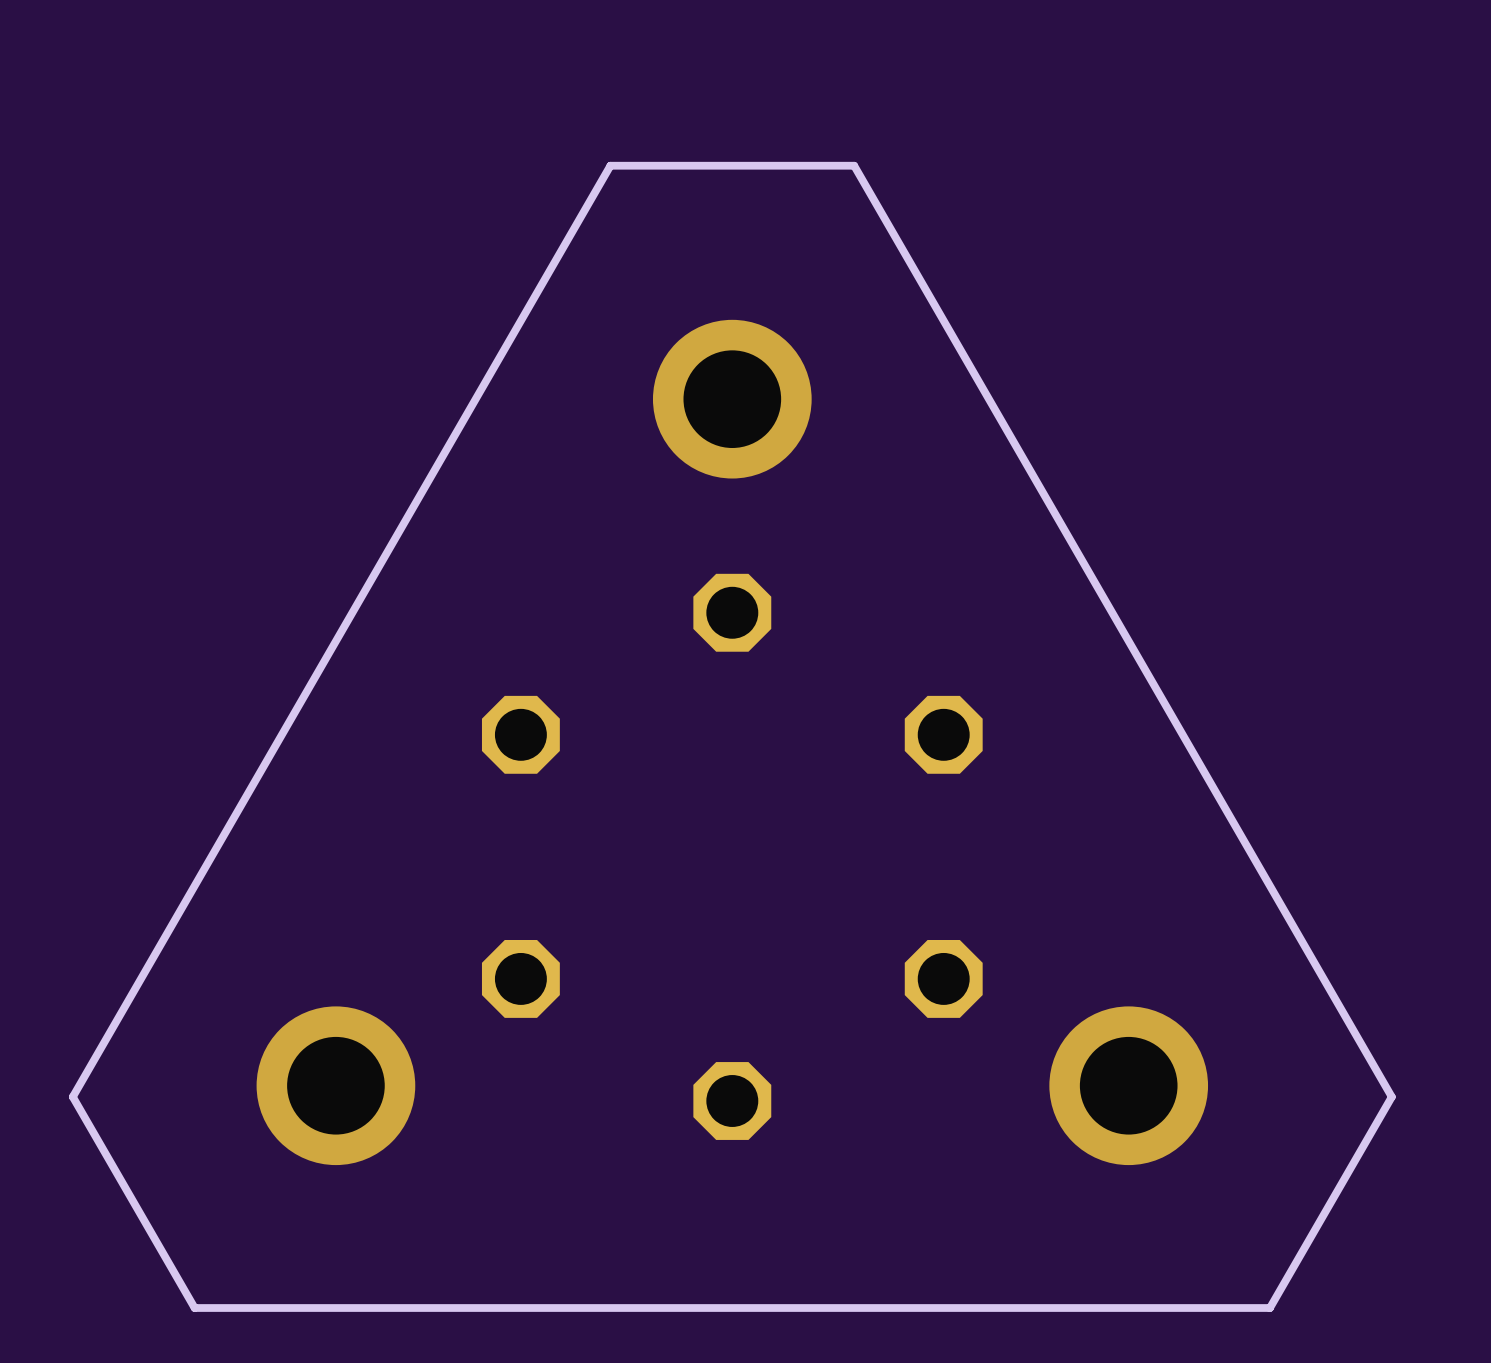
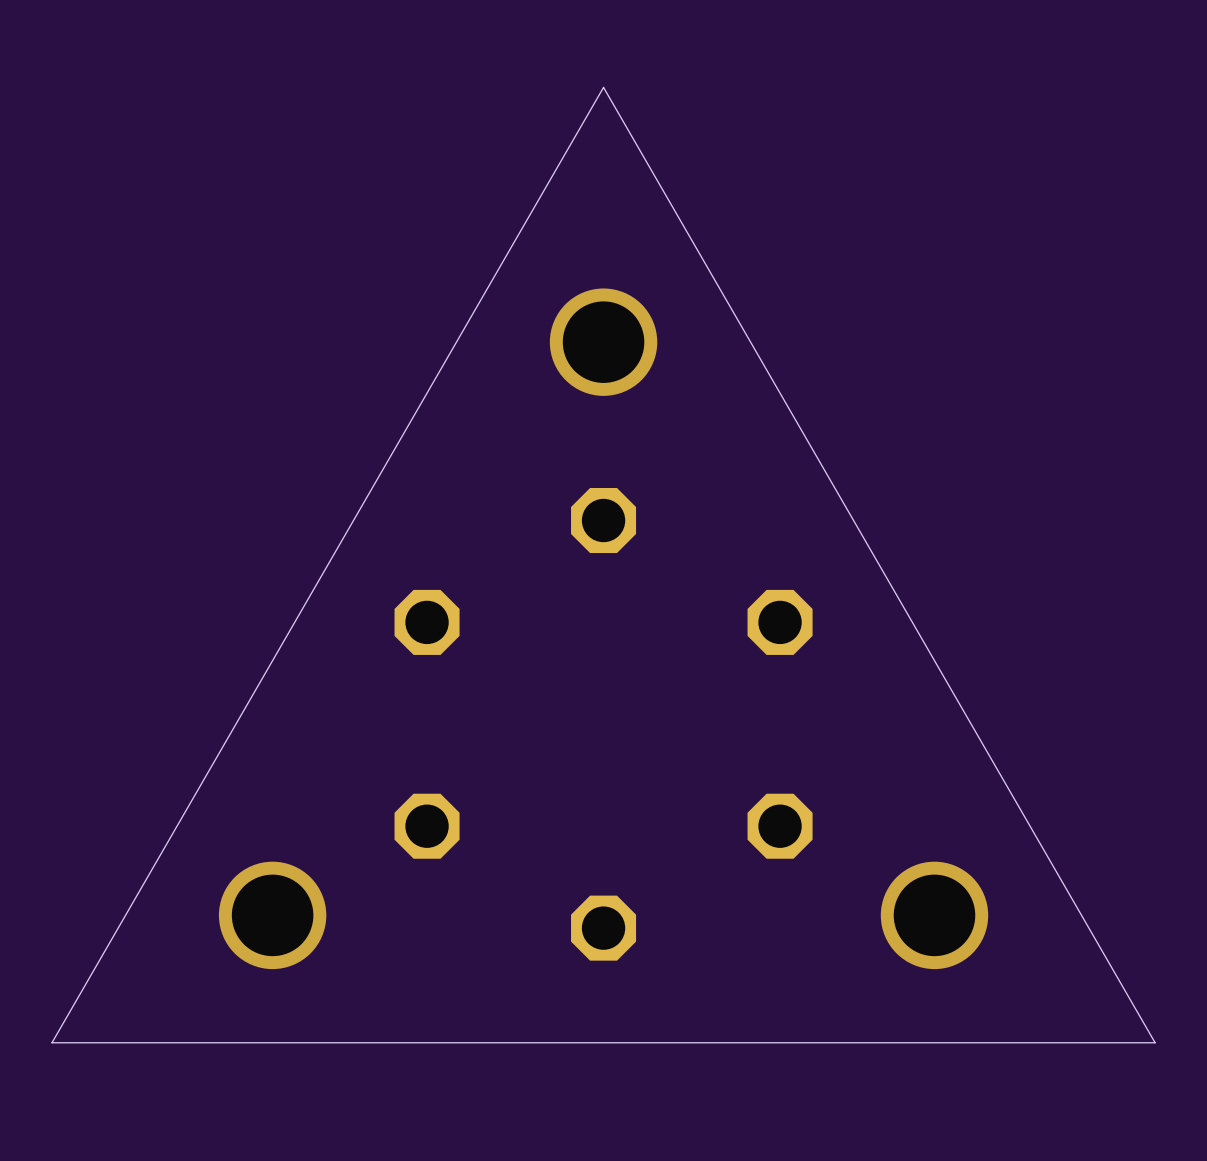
board edge: (854, 165) (610, 165) (72, 1096) (194, 1308) (1269, 1308) (1391, 1096) (854, 165) -> (603, 87) (1155, 1042) (51, 1042) (603, 87)
via size: [652, 319, 812, 479] -> [549, 288, 658, 396]
via size: [256, 1006, 416, 1166] -> [218, 861, 327, 970]
via size: [1049, 1006, 1209, 1166] -> [880, 861, 989, 970]

